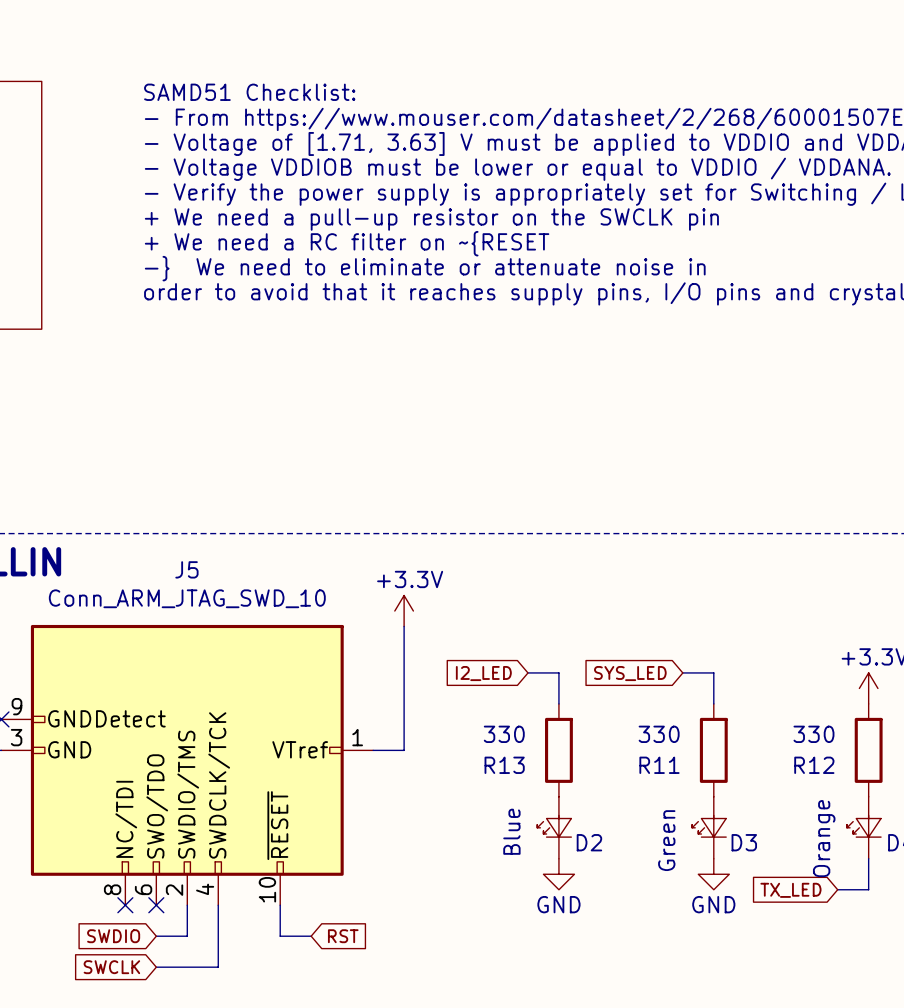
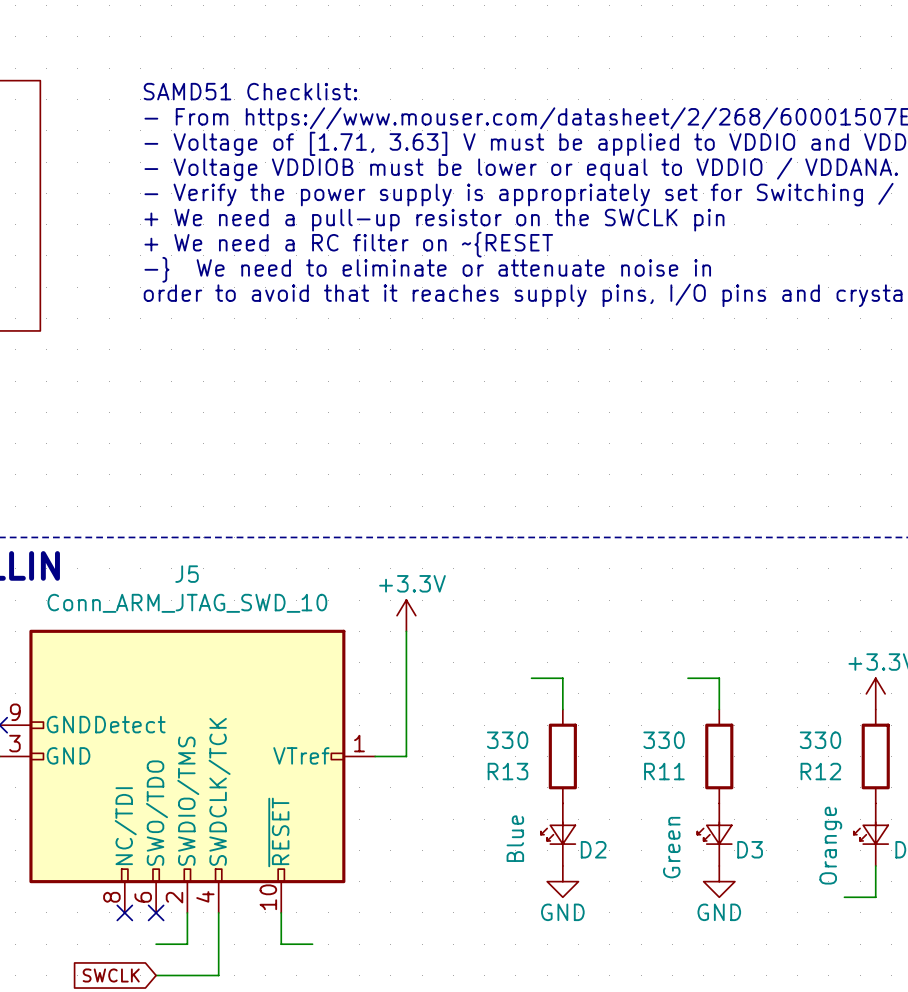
global label: I2_LED (483, 673) -> none
global label: SYS_LED (630, 673) -> none
global label: TX_LED (790, 890) -> none
global label: SWDIO (113, 936) -> none
global label: RST (343, 936) -> none

